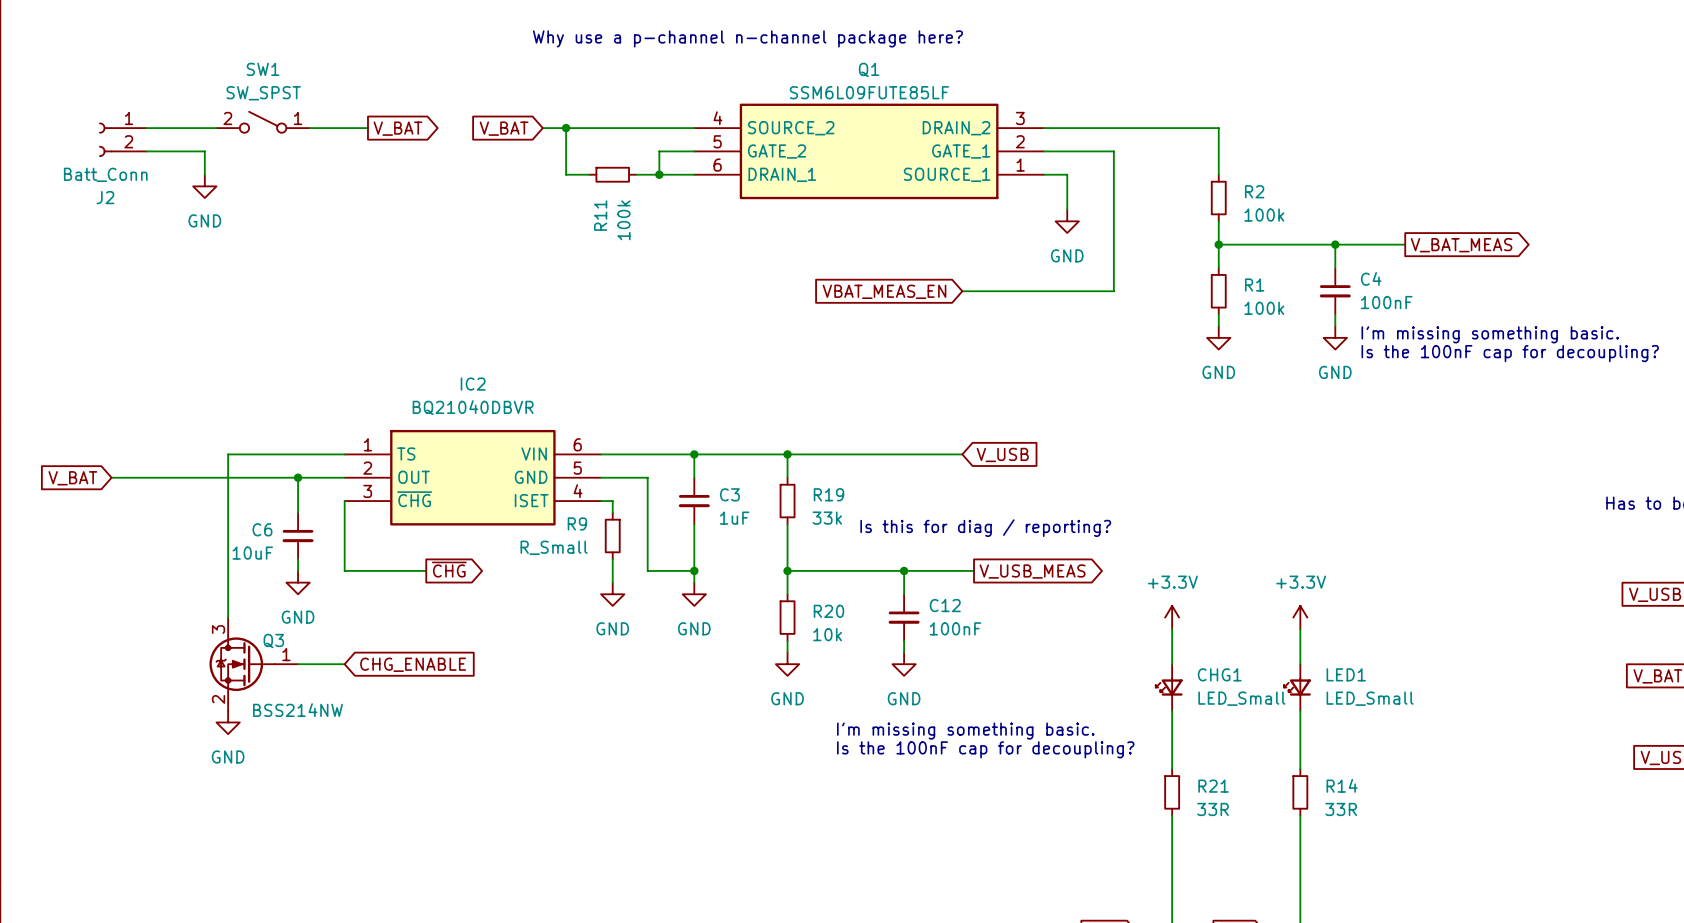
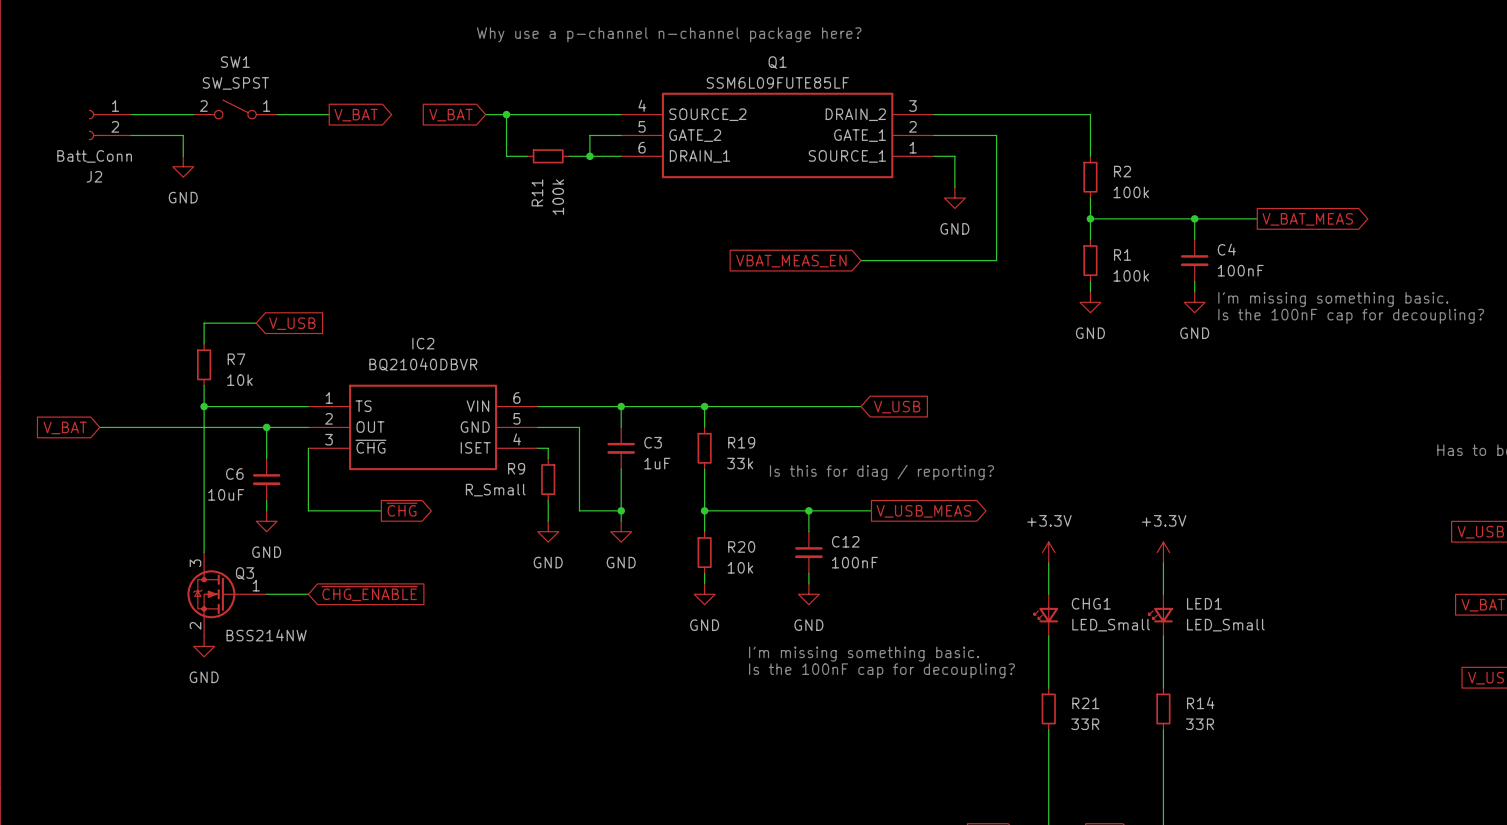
wire: none -> (256, 323) (204, 323) (204, 344)
global label: none -> V_USB (292, 323)
R7: none -> 10k (204, 364)
wire: none -> (204, 385) (204, 406)
junction: none -> (204, 406)
global label: CHG_ENABLE (413, 664) -> ~{CHG_ENABLE} (369, 593)

